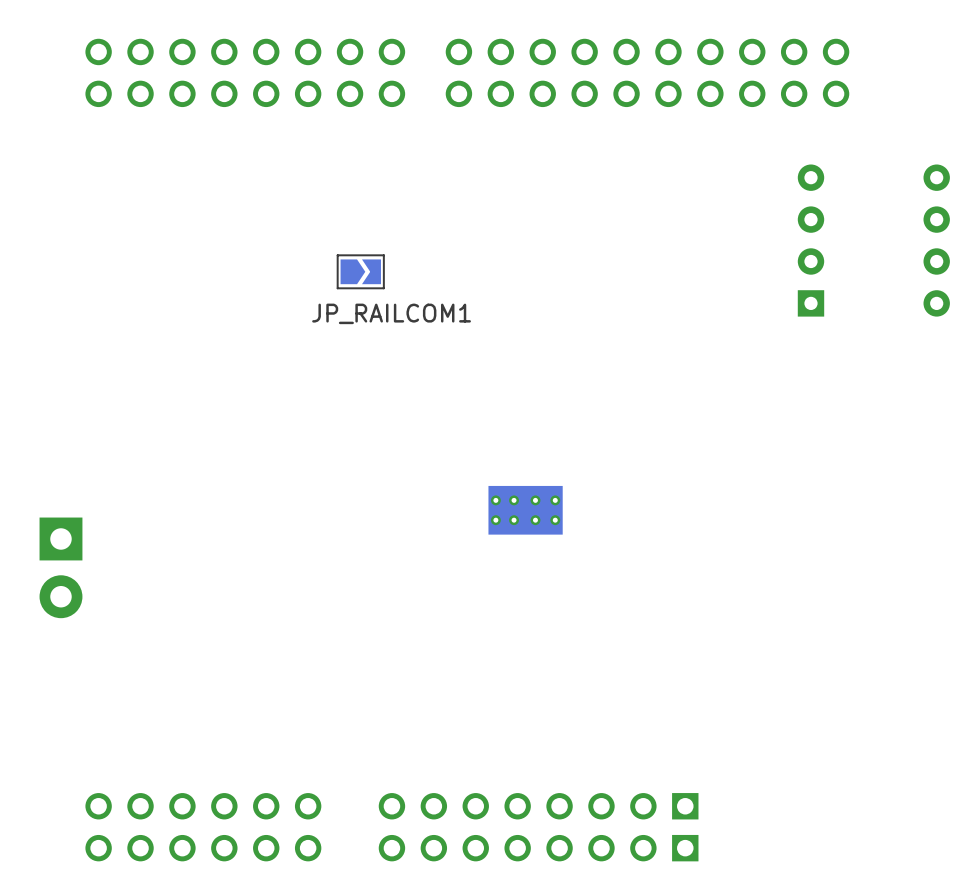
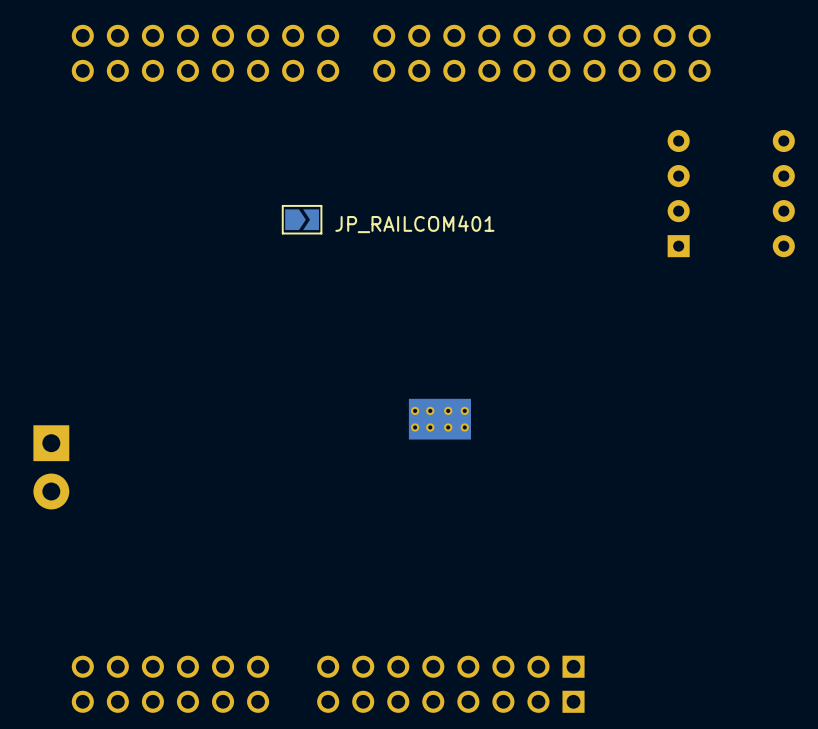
JP_RAILCOM1 name: JP_RAILCOM1 (391, 313) -> JP_RAILCOM401 (414, 224)

